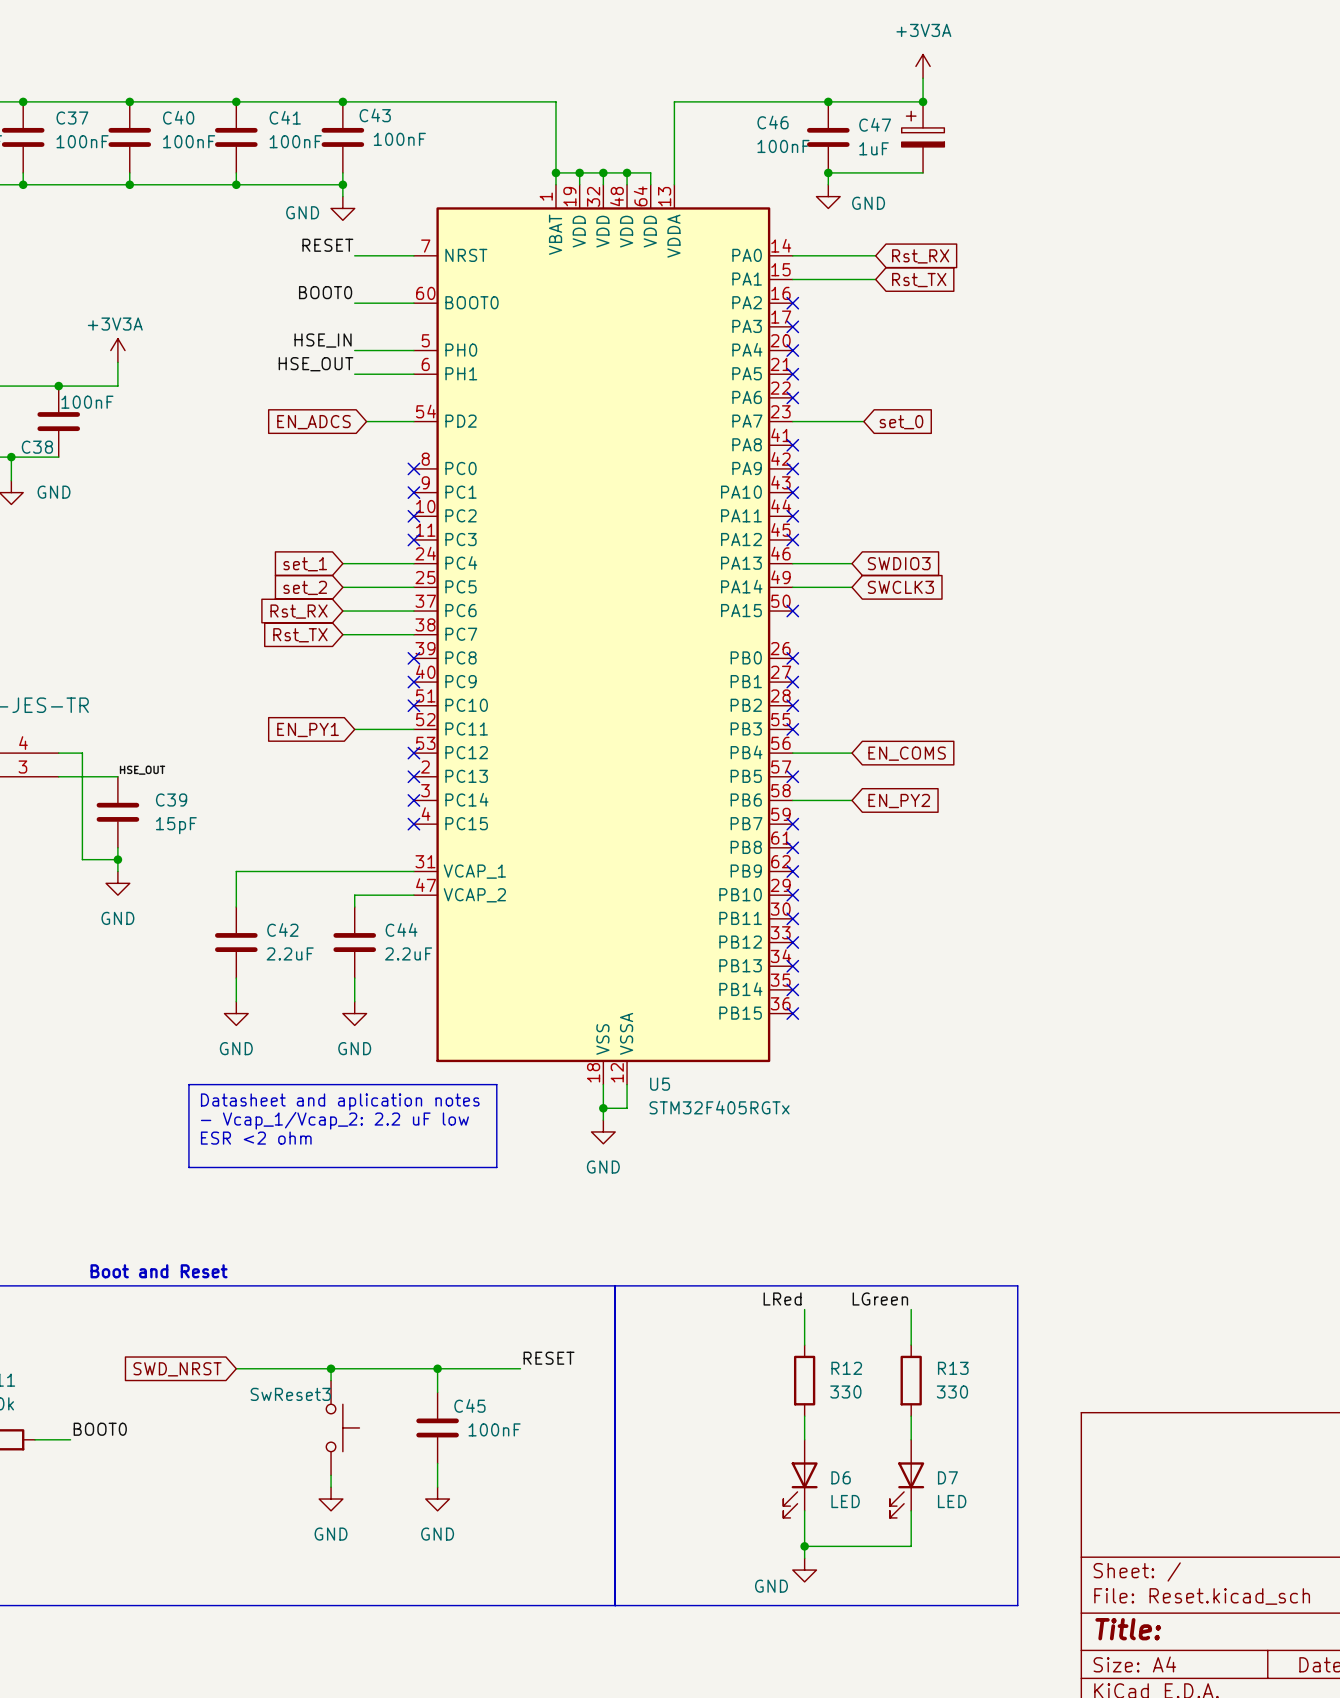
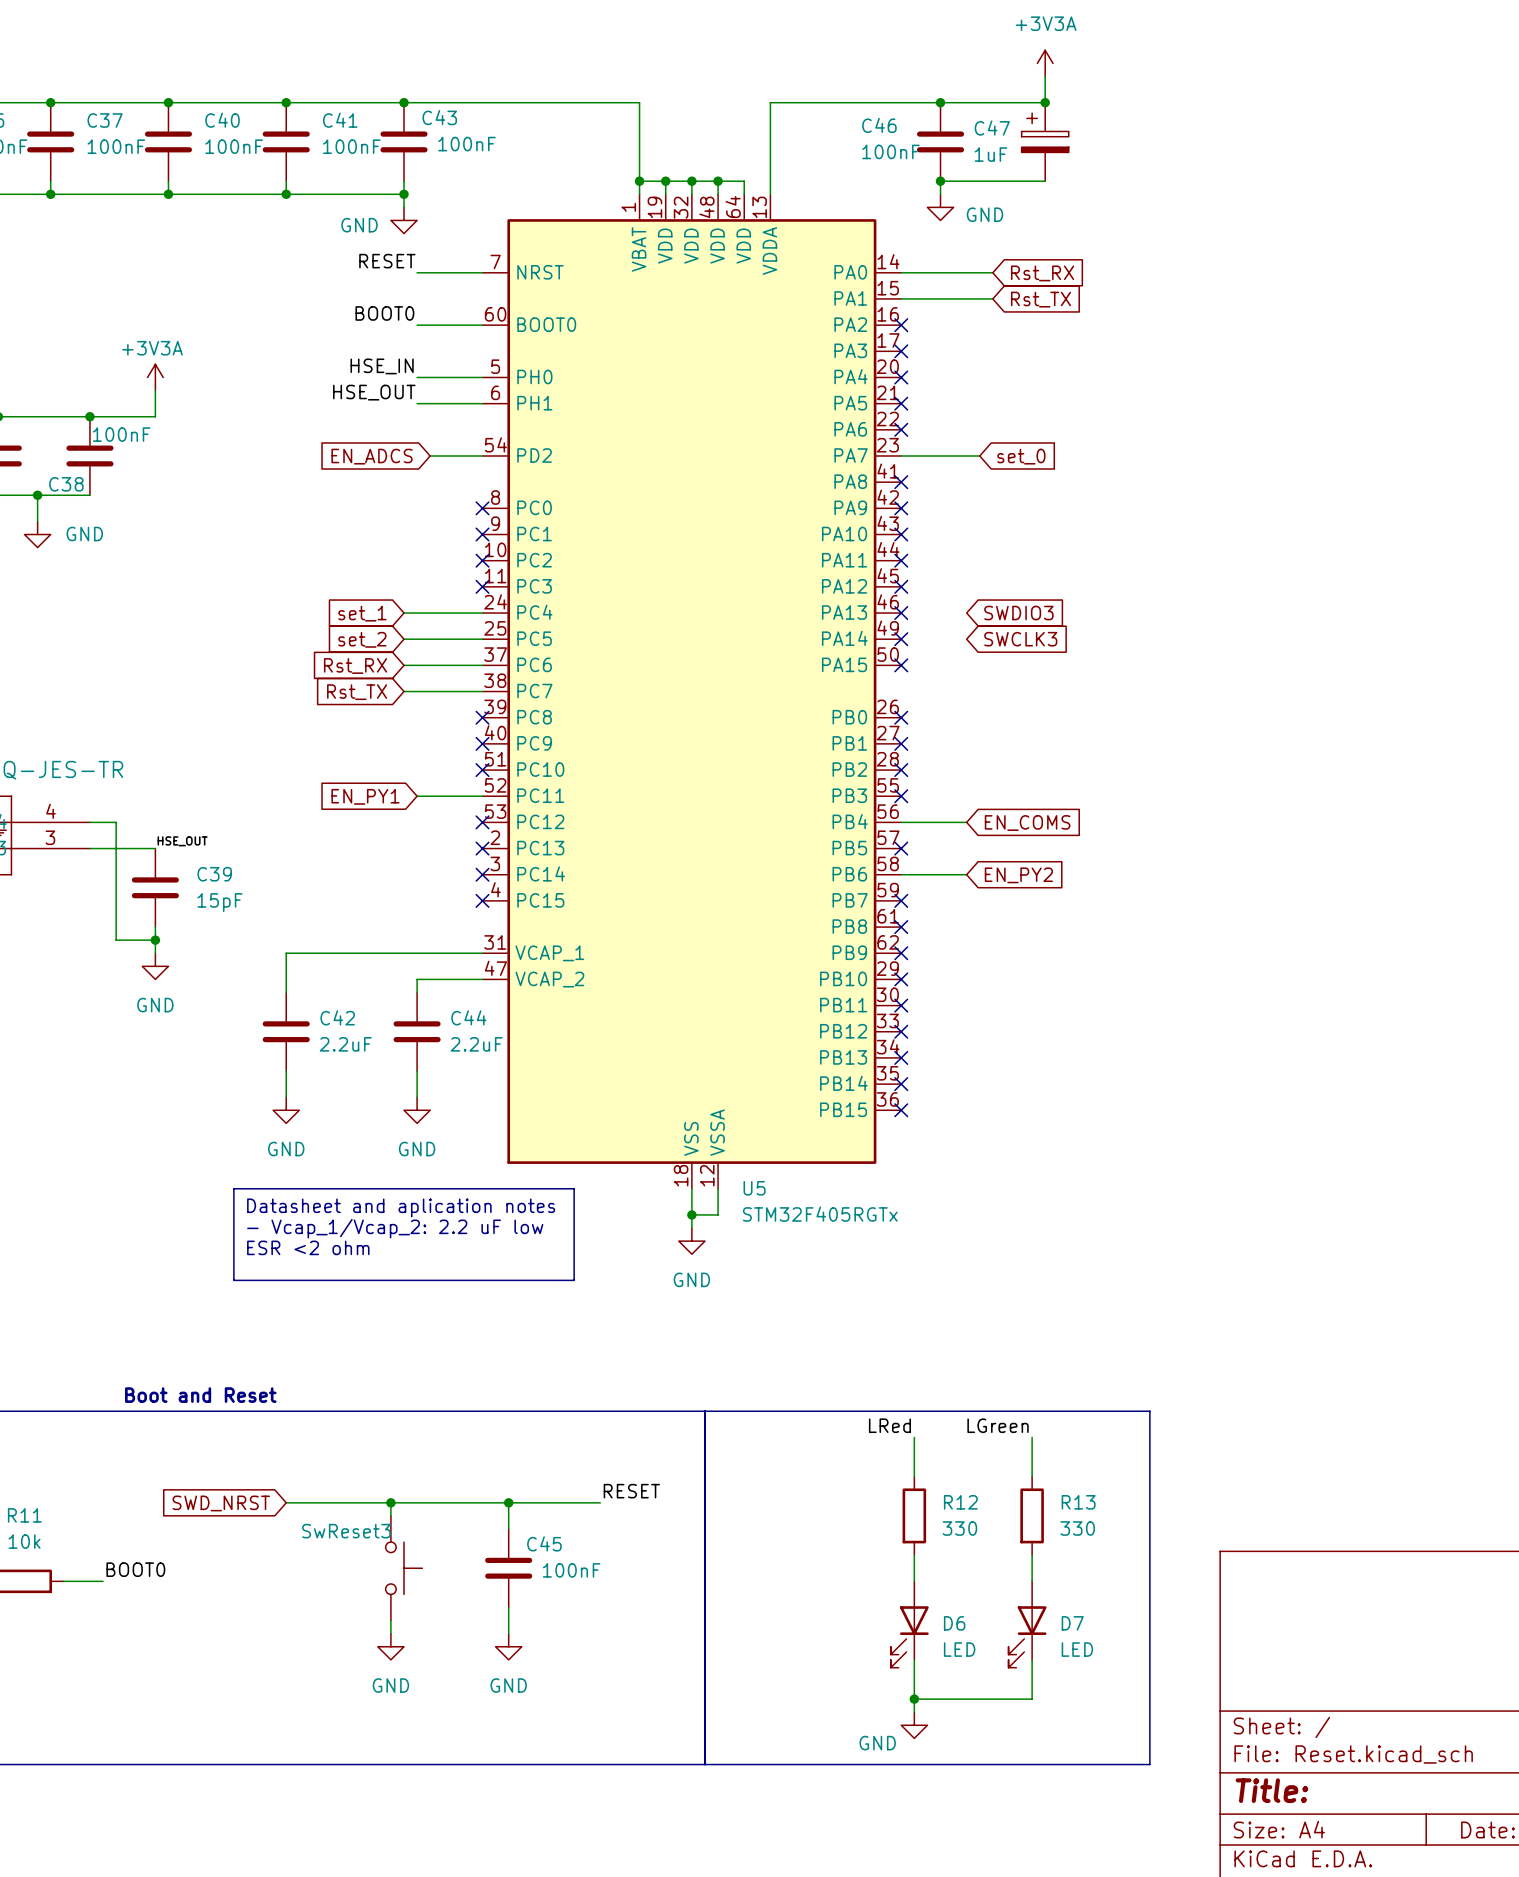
wire: (792, 563) (851, 563) -> none
no-connect mark: none -> (901, 613)
wire: (792, 587) (851, 587) -> none
no-connect mark: none -> (901, 639)

